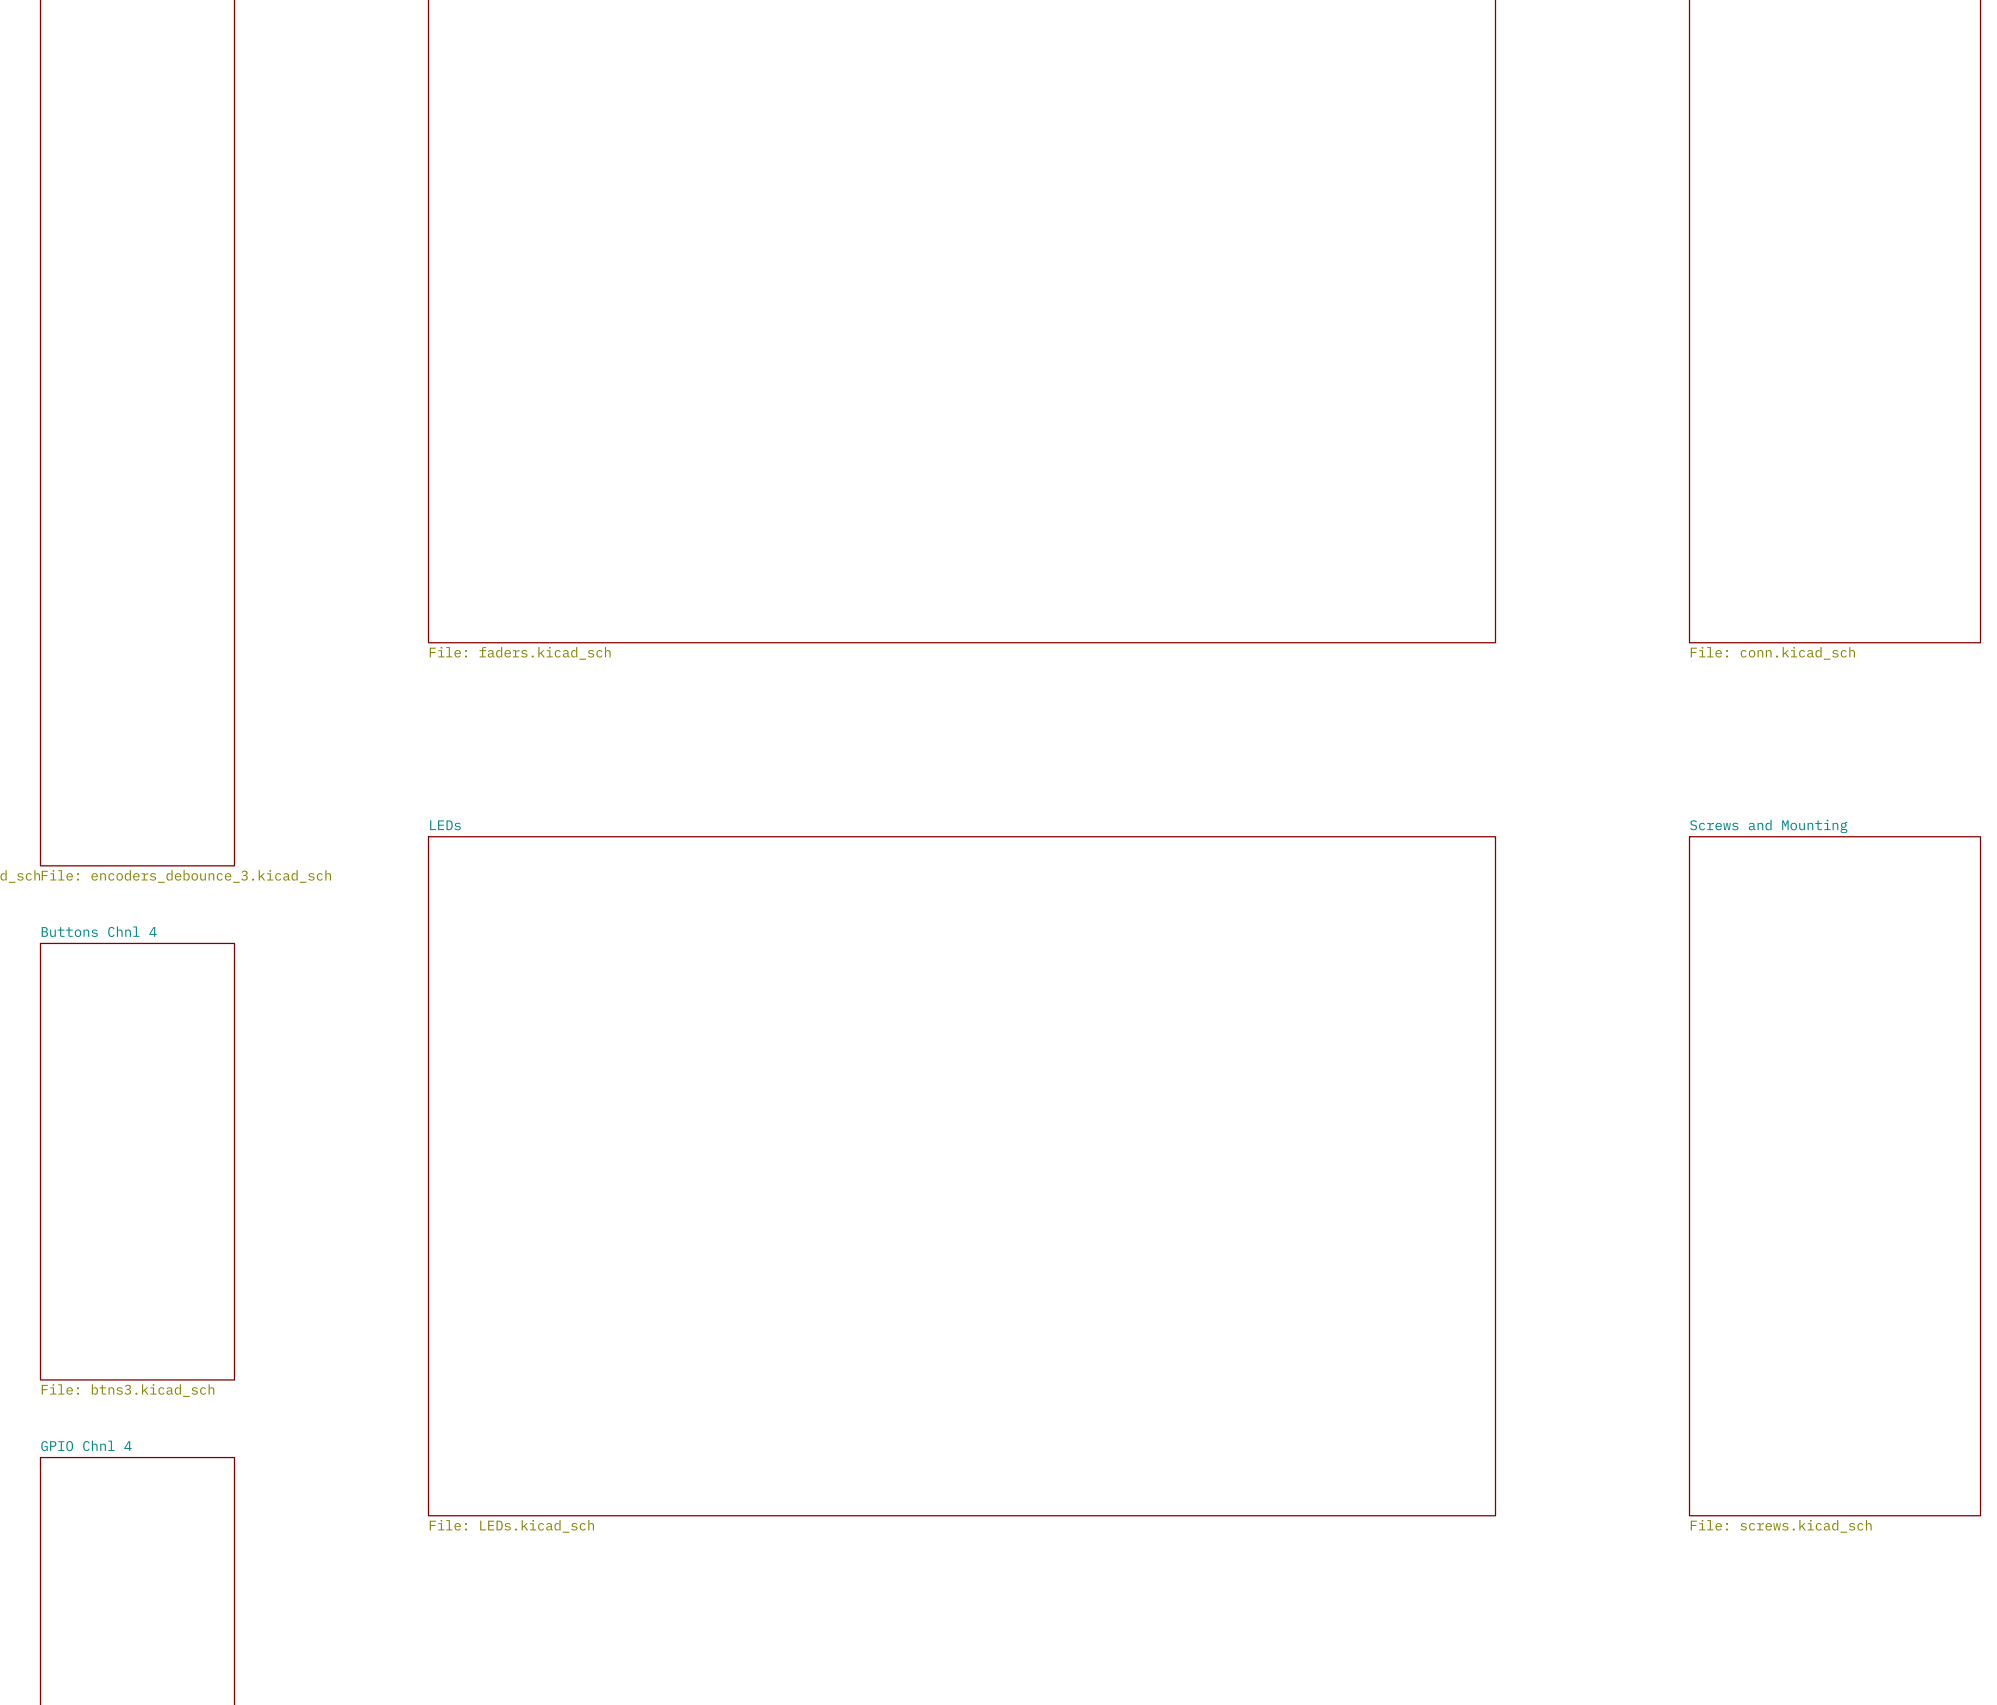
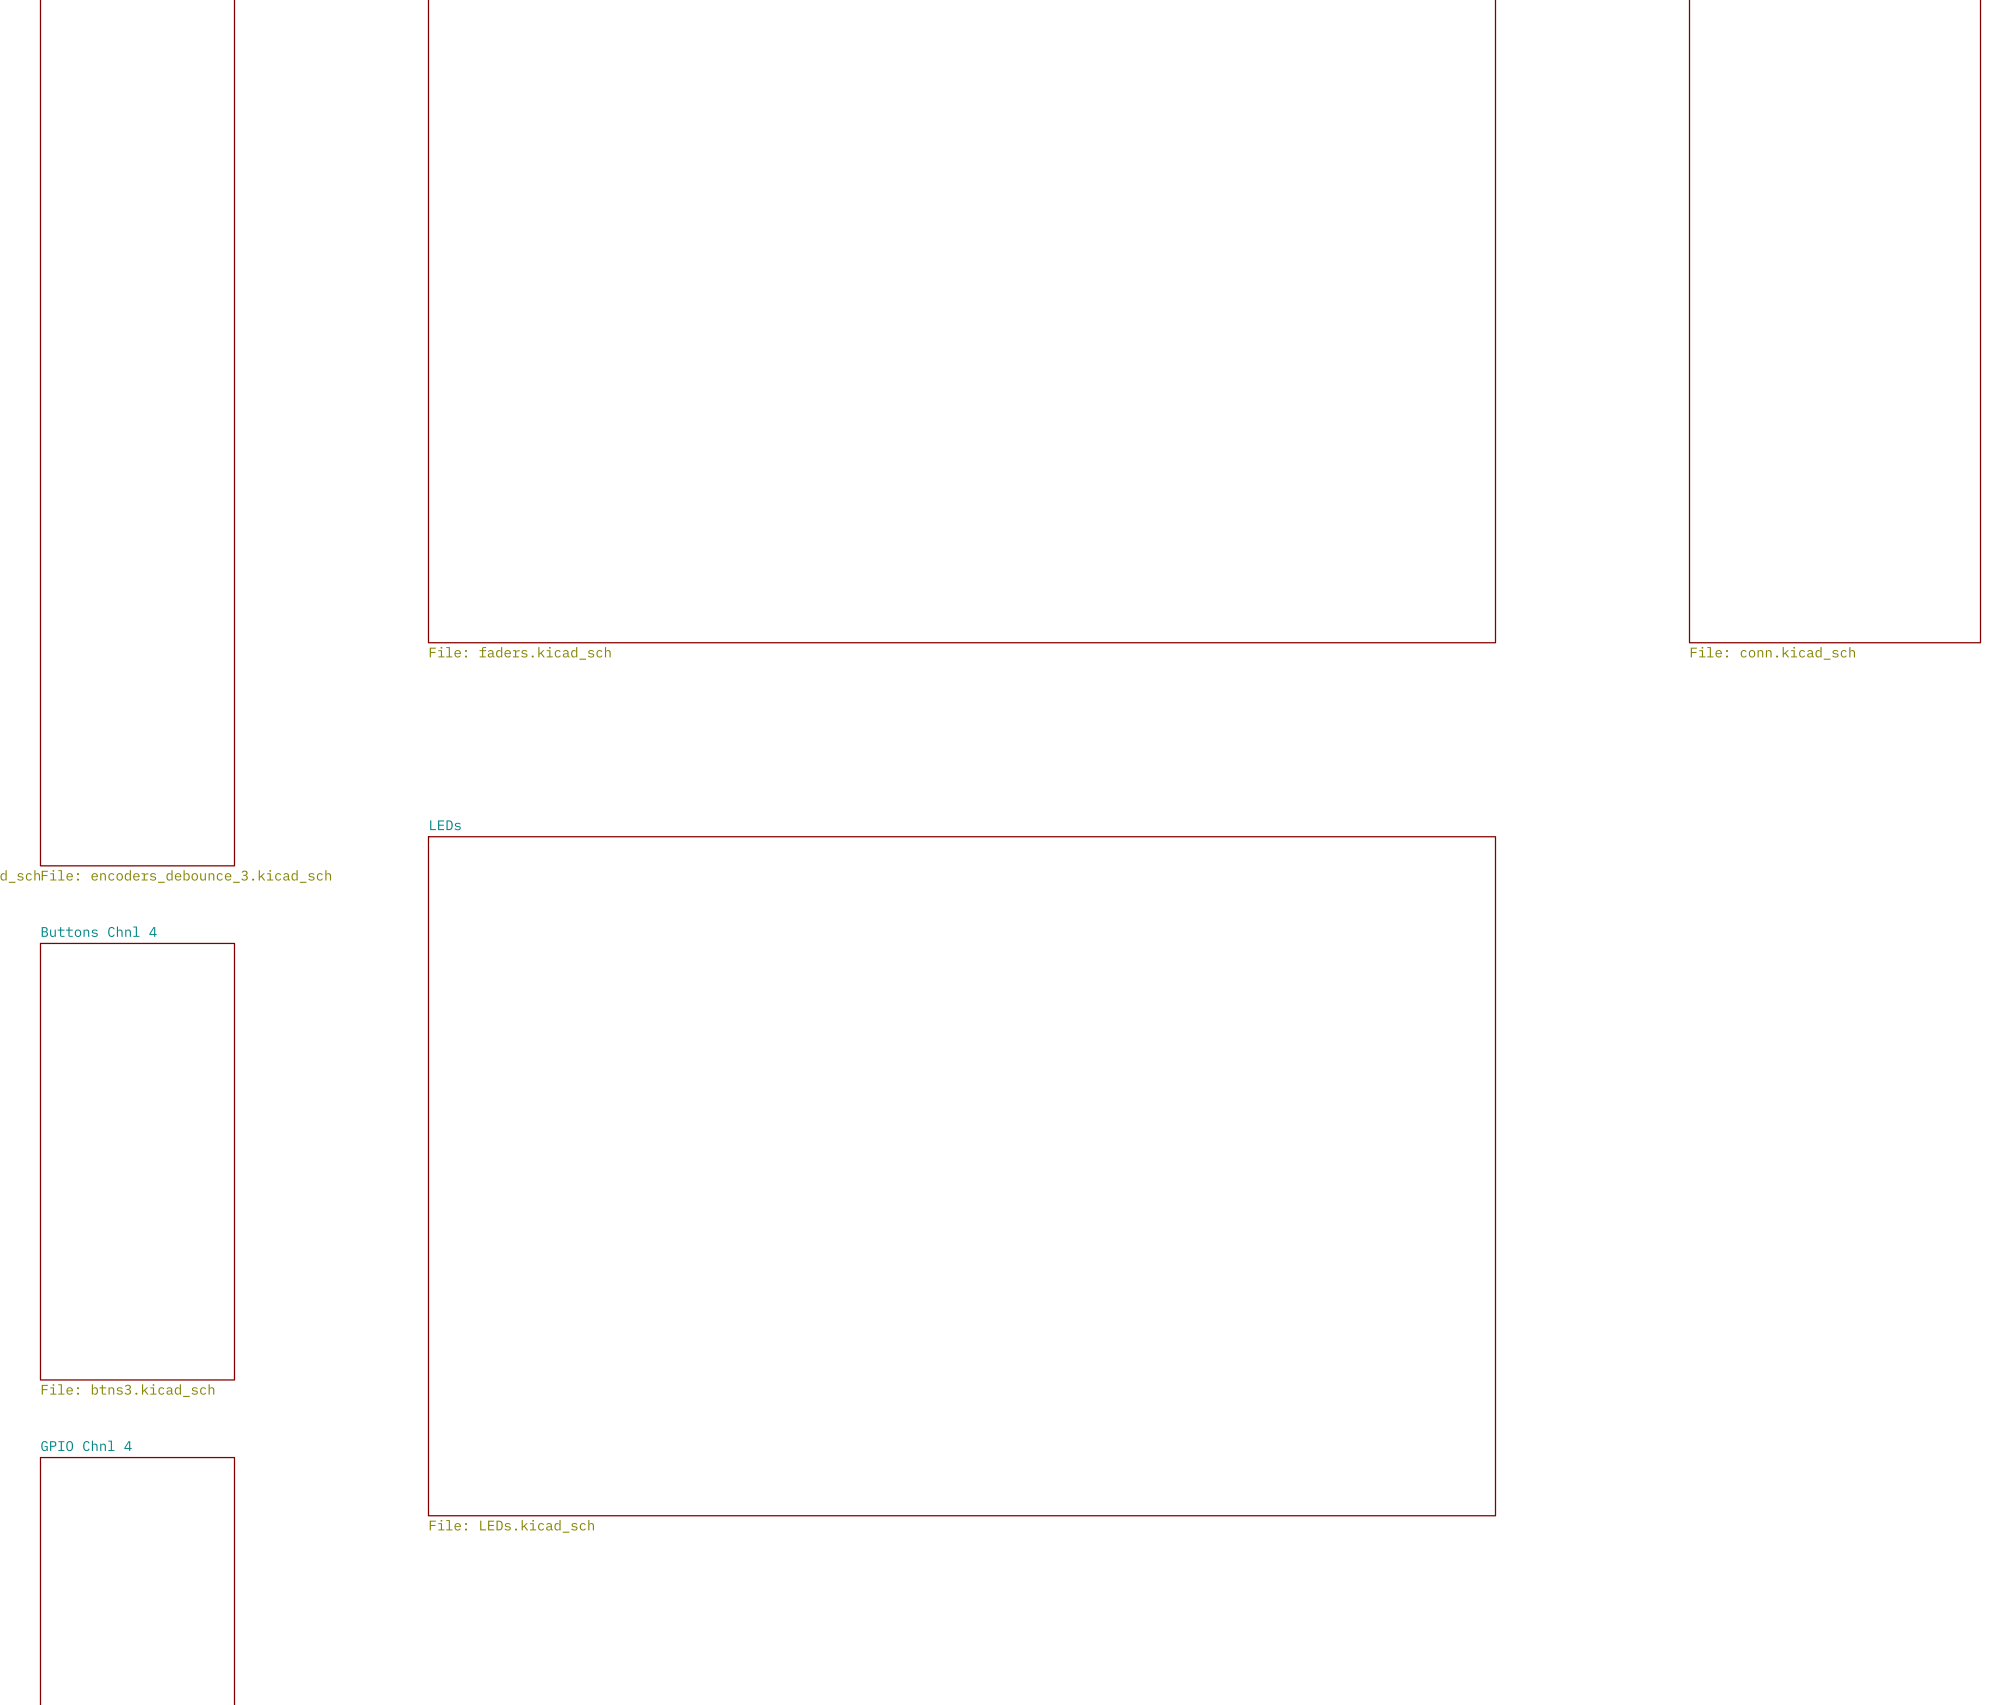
sheet Screws and Mounting: File: screws.kicad_sch (1835, 1176) -> none

